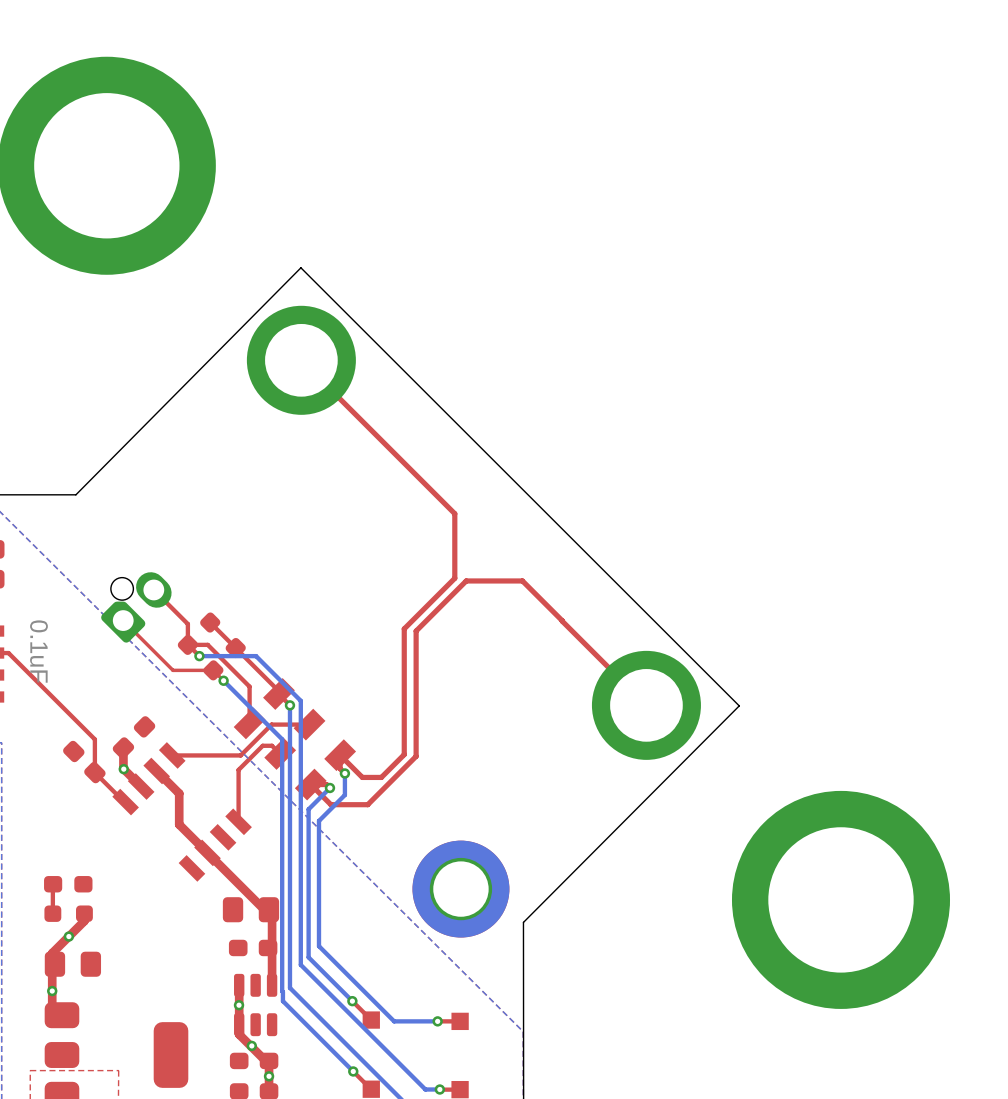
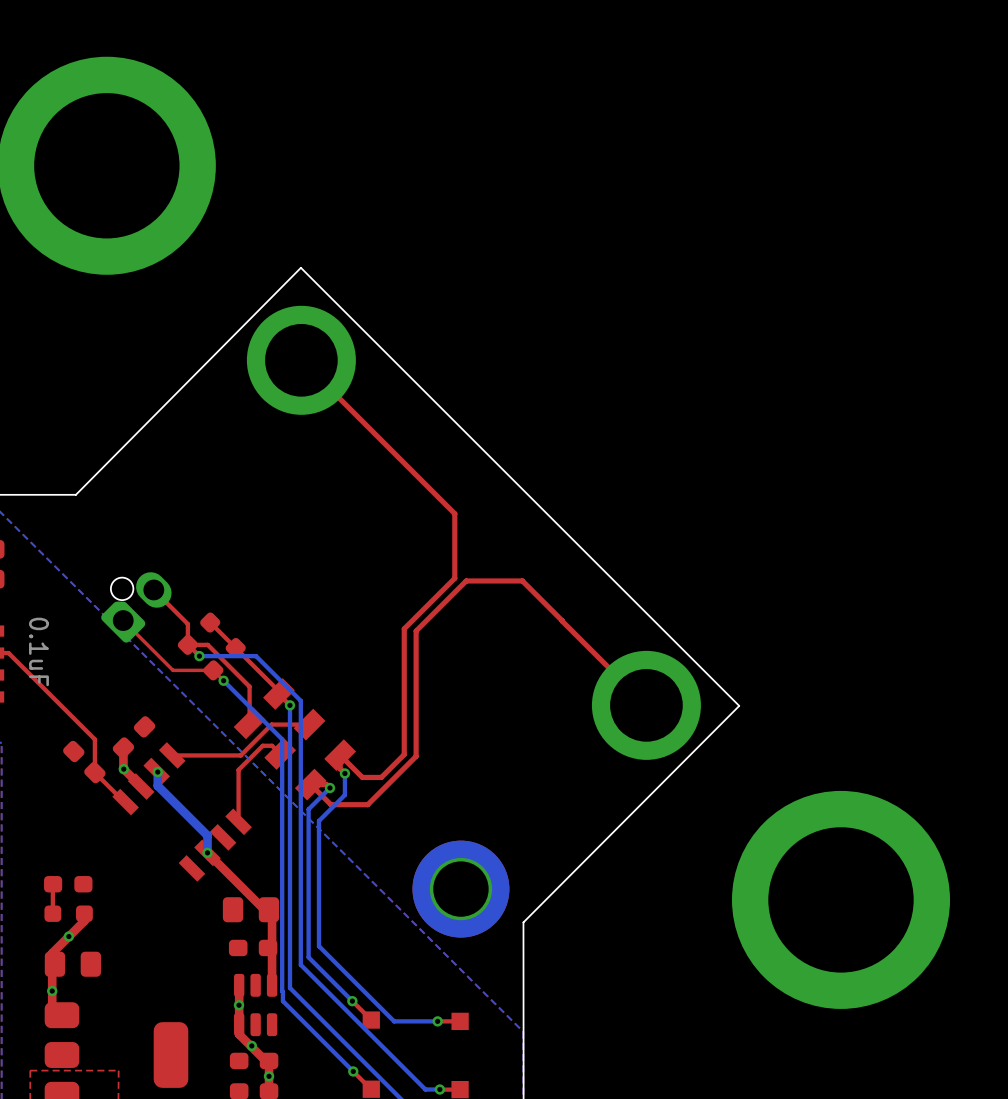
top track: (157, 772) (179, 793) (179, 824) (207, 852) -> none
bottom track: none -> (157, 772) (157, 785) (207, 835) (207, 852)
via: none -> (157, 772)
via: none -> (207, 852)

